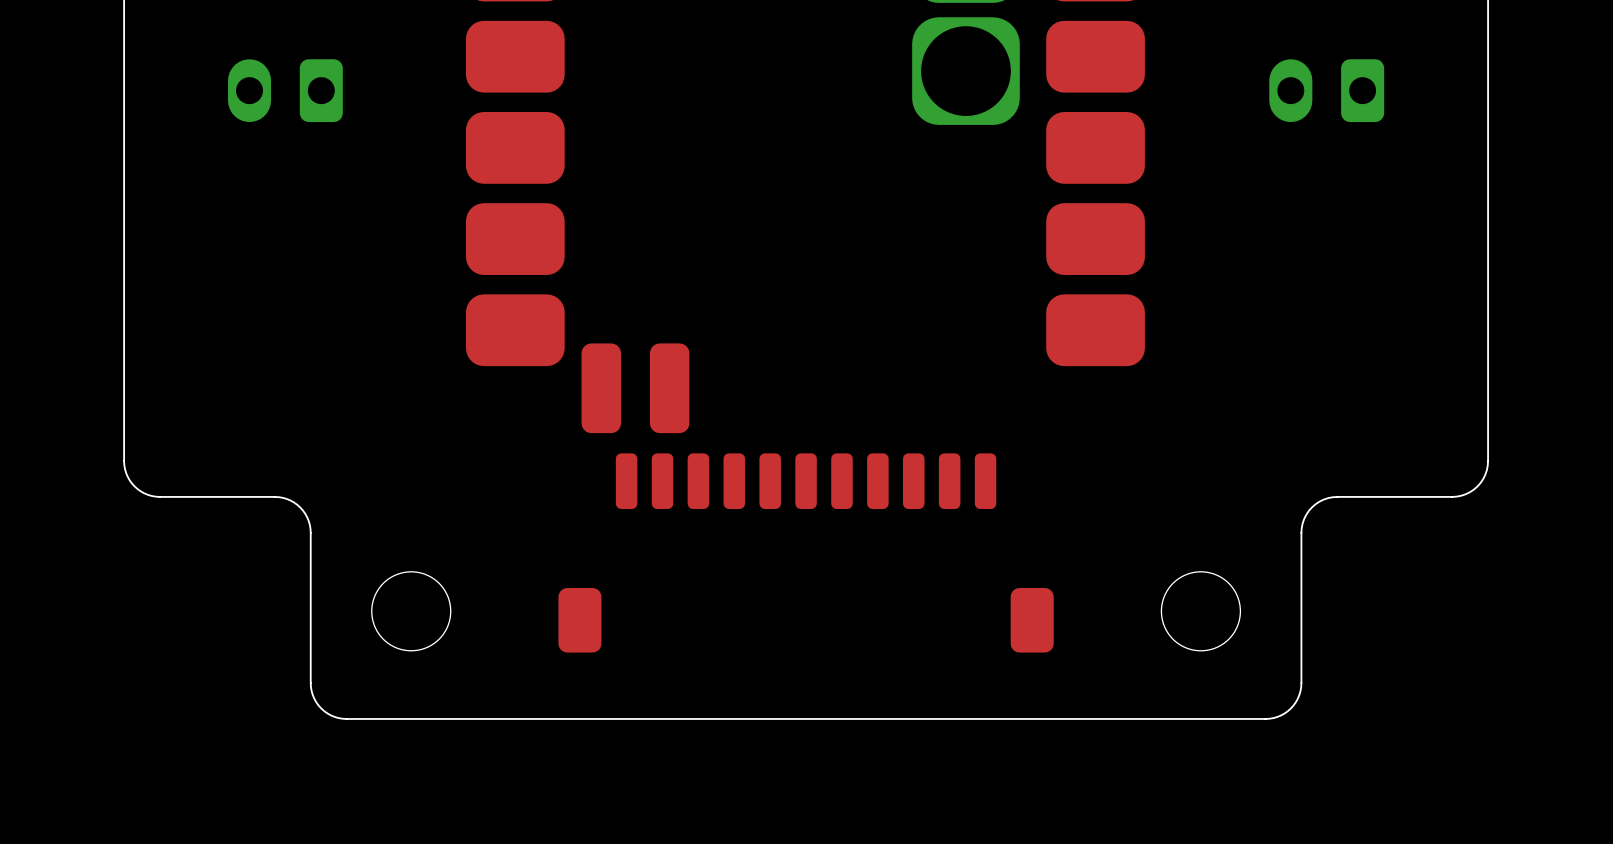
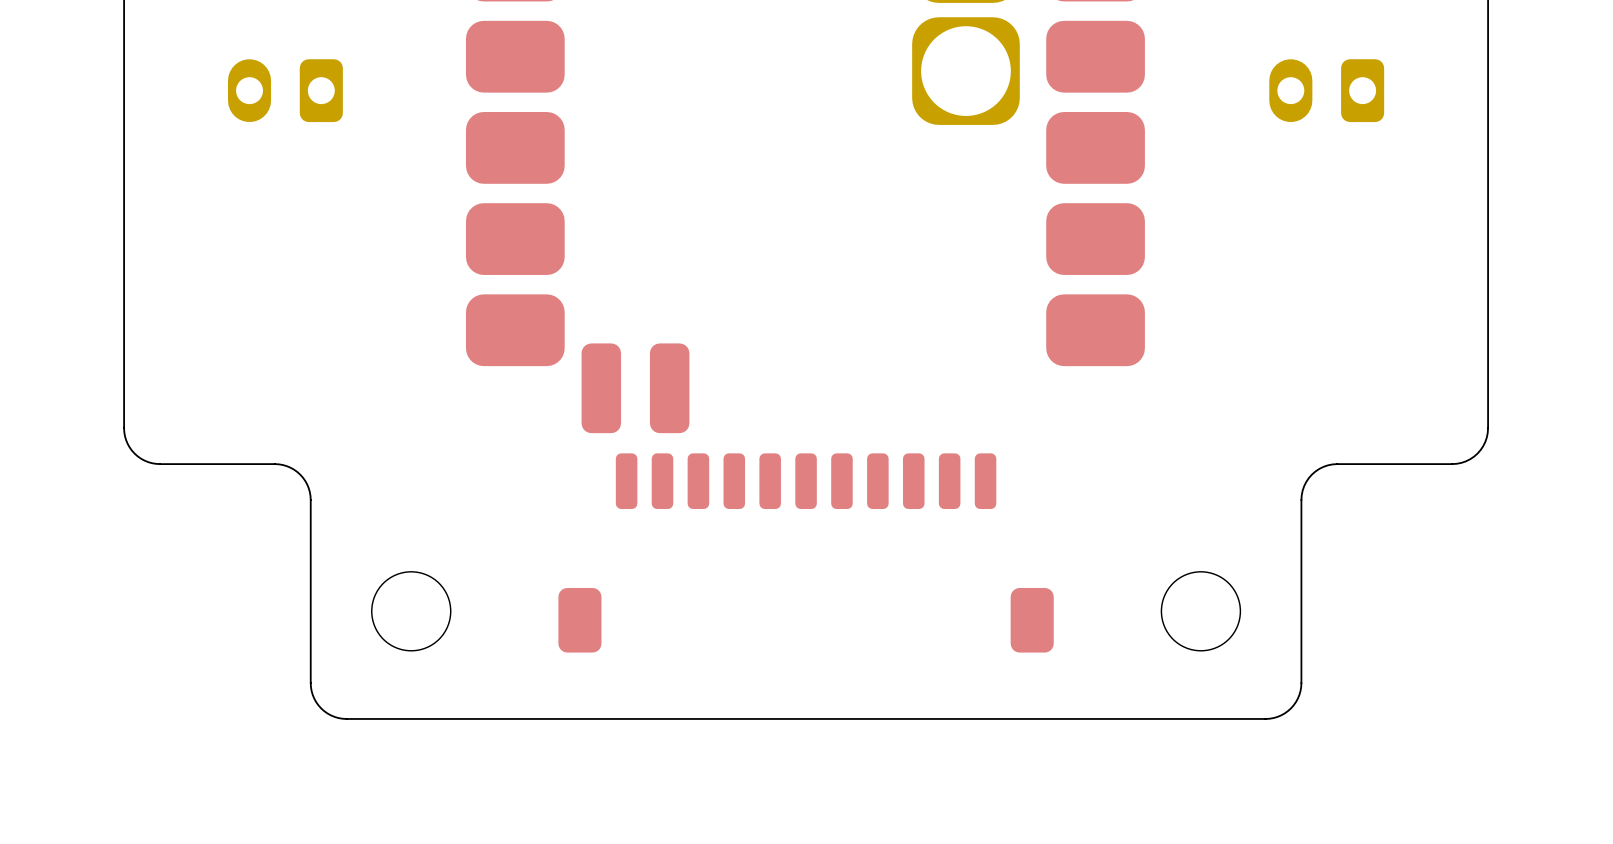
board edge: (124, 428) (124, 469) (129, 480) (140, 491) (159, 496) (282, 497) (293, 502) (302, 510) (308, 520) (310, 532) -> (124, 428) (126, 440) (131, 450) (140, 458) (151, 463) (274, 464) (293, 469) (305, 480) (309, 492) (310, 532)
board edge: (1488, 428) (1486, 470) (1480, 482) (1470, 492) (1452, 496) (1328, 498) (1319, 501) (1308, 510) (1302, 523) (1301, 532) -> (1488, 428) (1485, 441) (1480, 450) (1474, 456) (1461, 462) (1337, 464) (1319, 468) (1308, 478) (1302, 490) (1301, 532)

